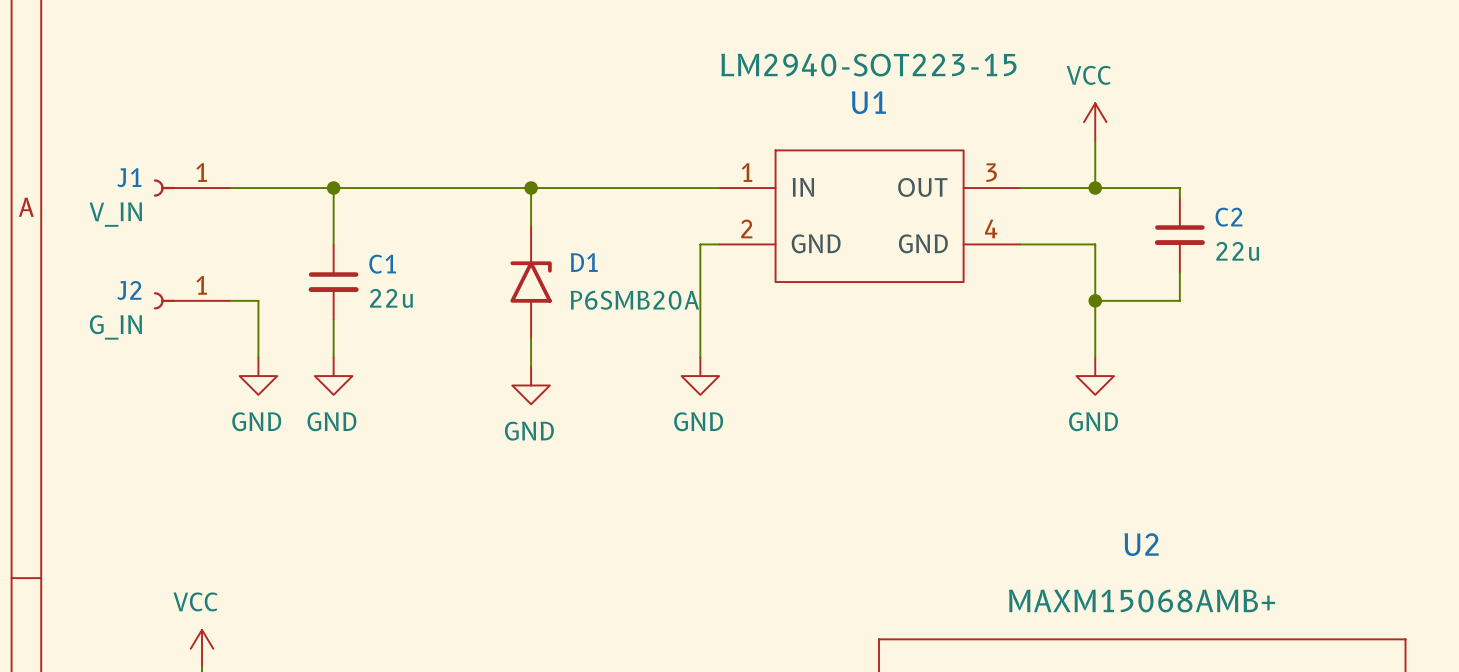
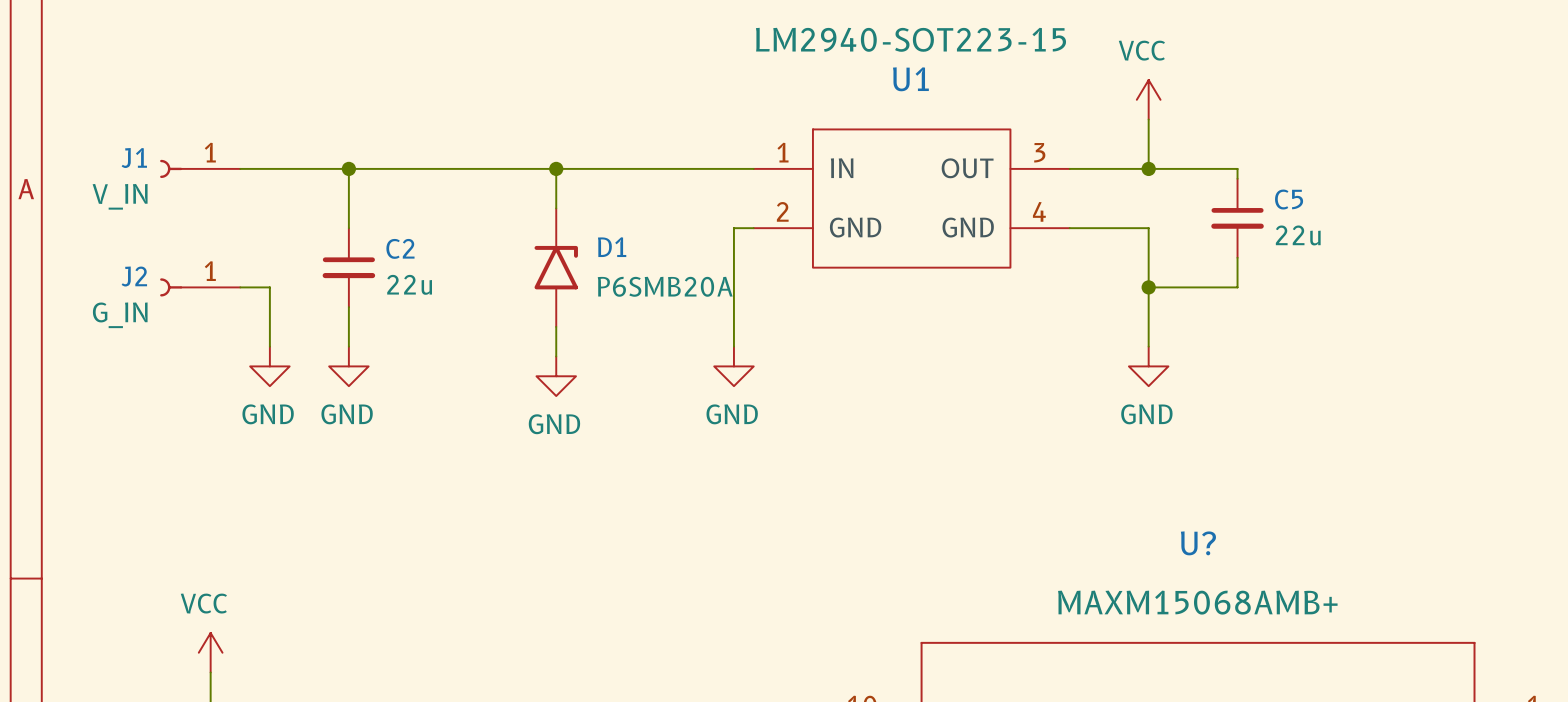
C2 name: C2 (1228, 217) -> C5 (1289, 199)
C1 name: C1 (382, 264) -> C2 (400, 248)
U2 name: U2 (1141, 544) -> U? (1198, 543)

